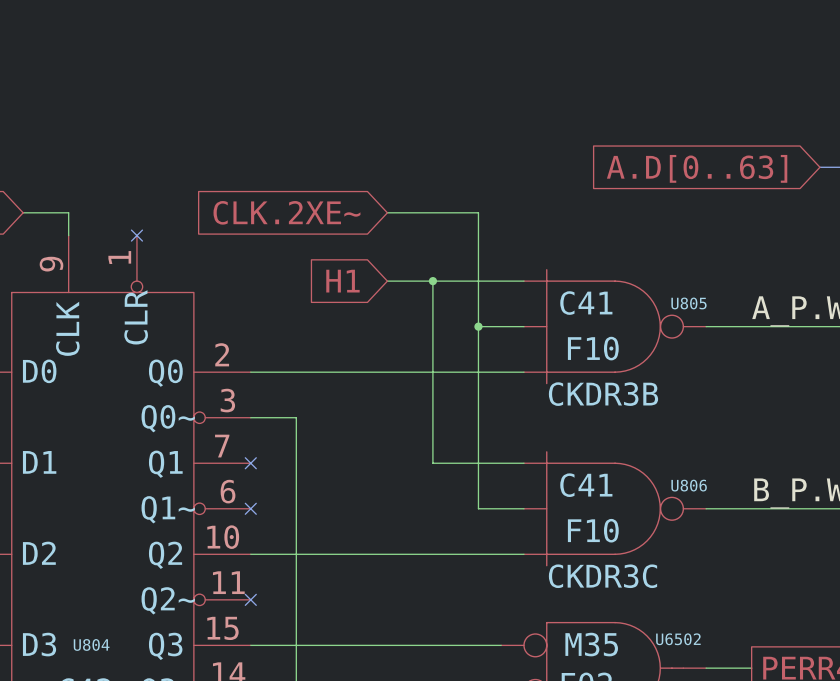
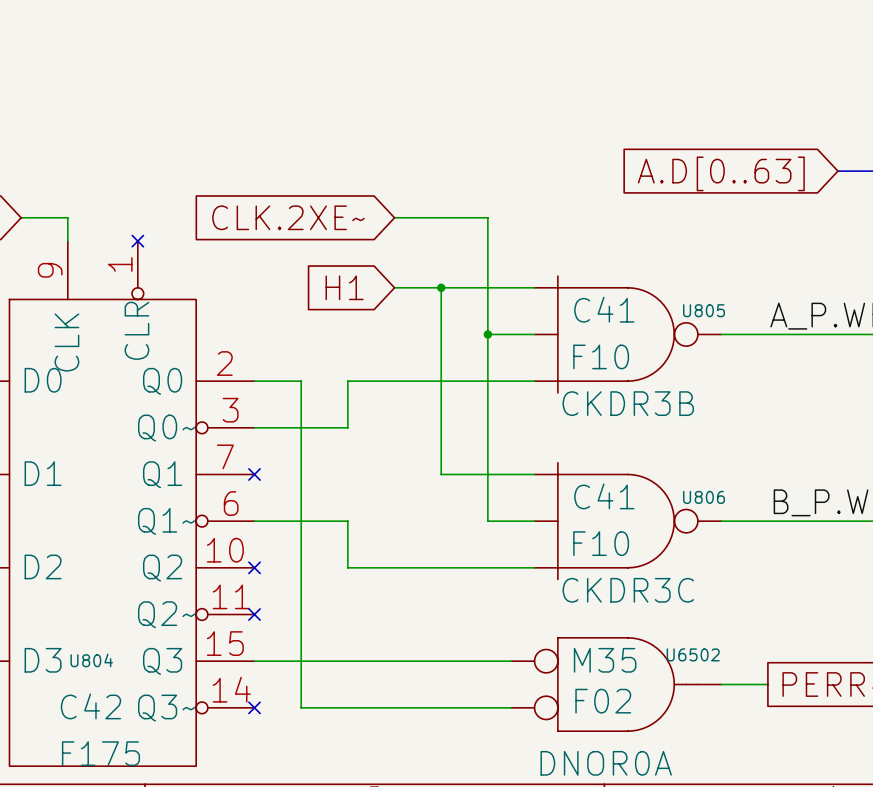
wire: (296, 372) (341, 372) -> (301, 381) (301, 427) (347, 427) (347, 381)
no-connect mark position: (250, 508) -> (254, 567)
wire: (250, 554) (341, 554) -> (254, 521) (347, 521) (347, 567)

